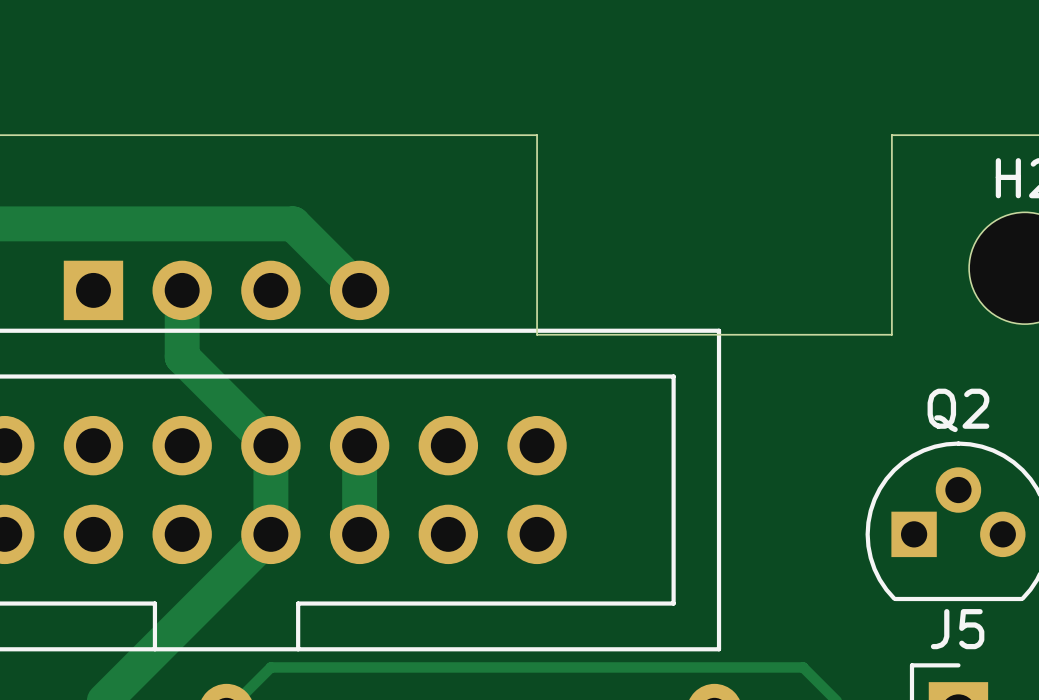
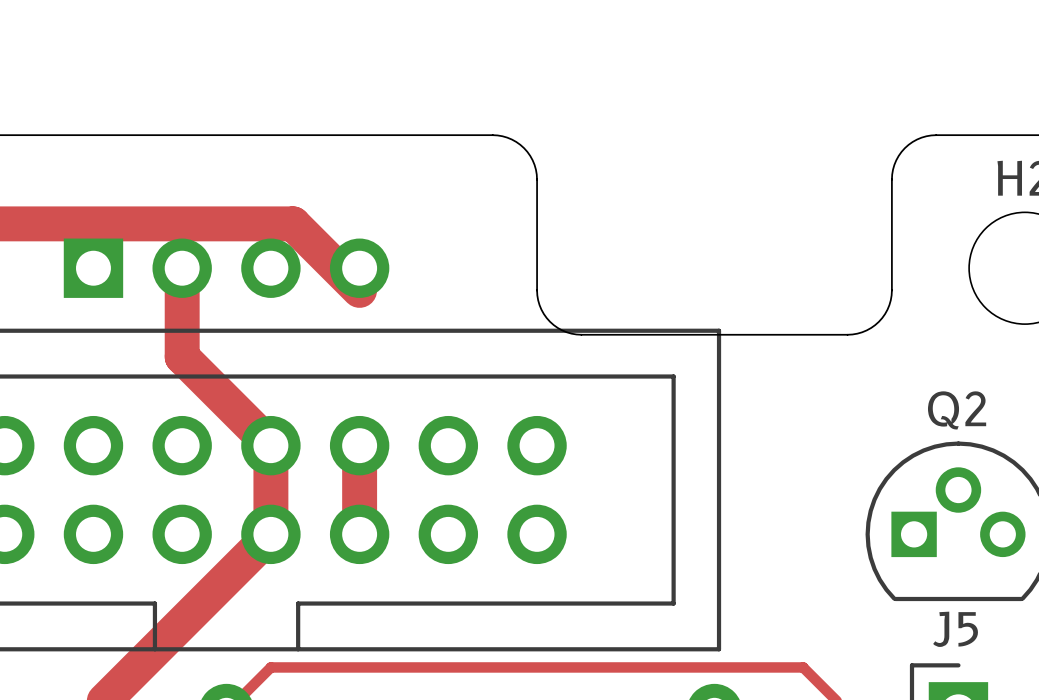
board edge: (492, 135) (537, 135) (537, 179) -> (492, 135) (507, 137) (524, 148) (534, 164) (537, 179)
board edge: (936, 135) (891, 135) (891, 179) -> (936, 135) (921, 137) (904, 148) (894, 164) (891, 179)
part position: (226, 290) -> (226, 268)
board edge: (537, 290) (537, 334) (581, 334) -> (537, 290) (539, 305) (550, 321) (566, 332) (581, 334)
board edge: (891, 290) (891, 334) (847, 334) -> (891, 290) (887, 309) (878, 321) (866, 330) (847, 334)

